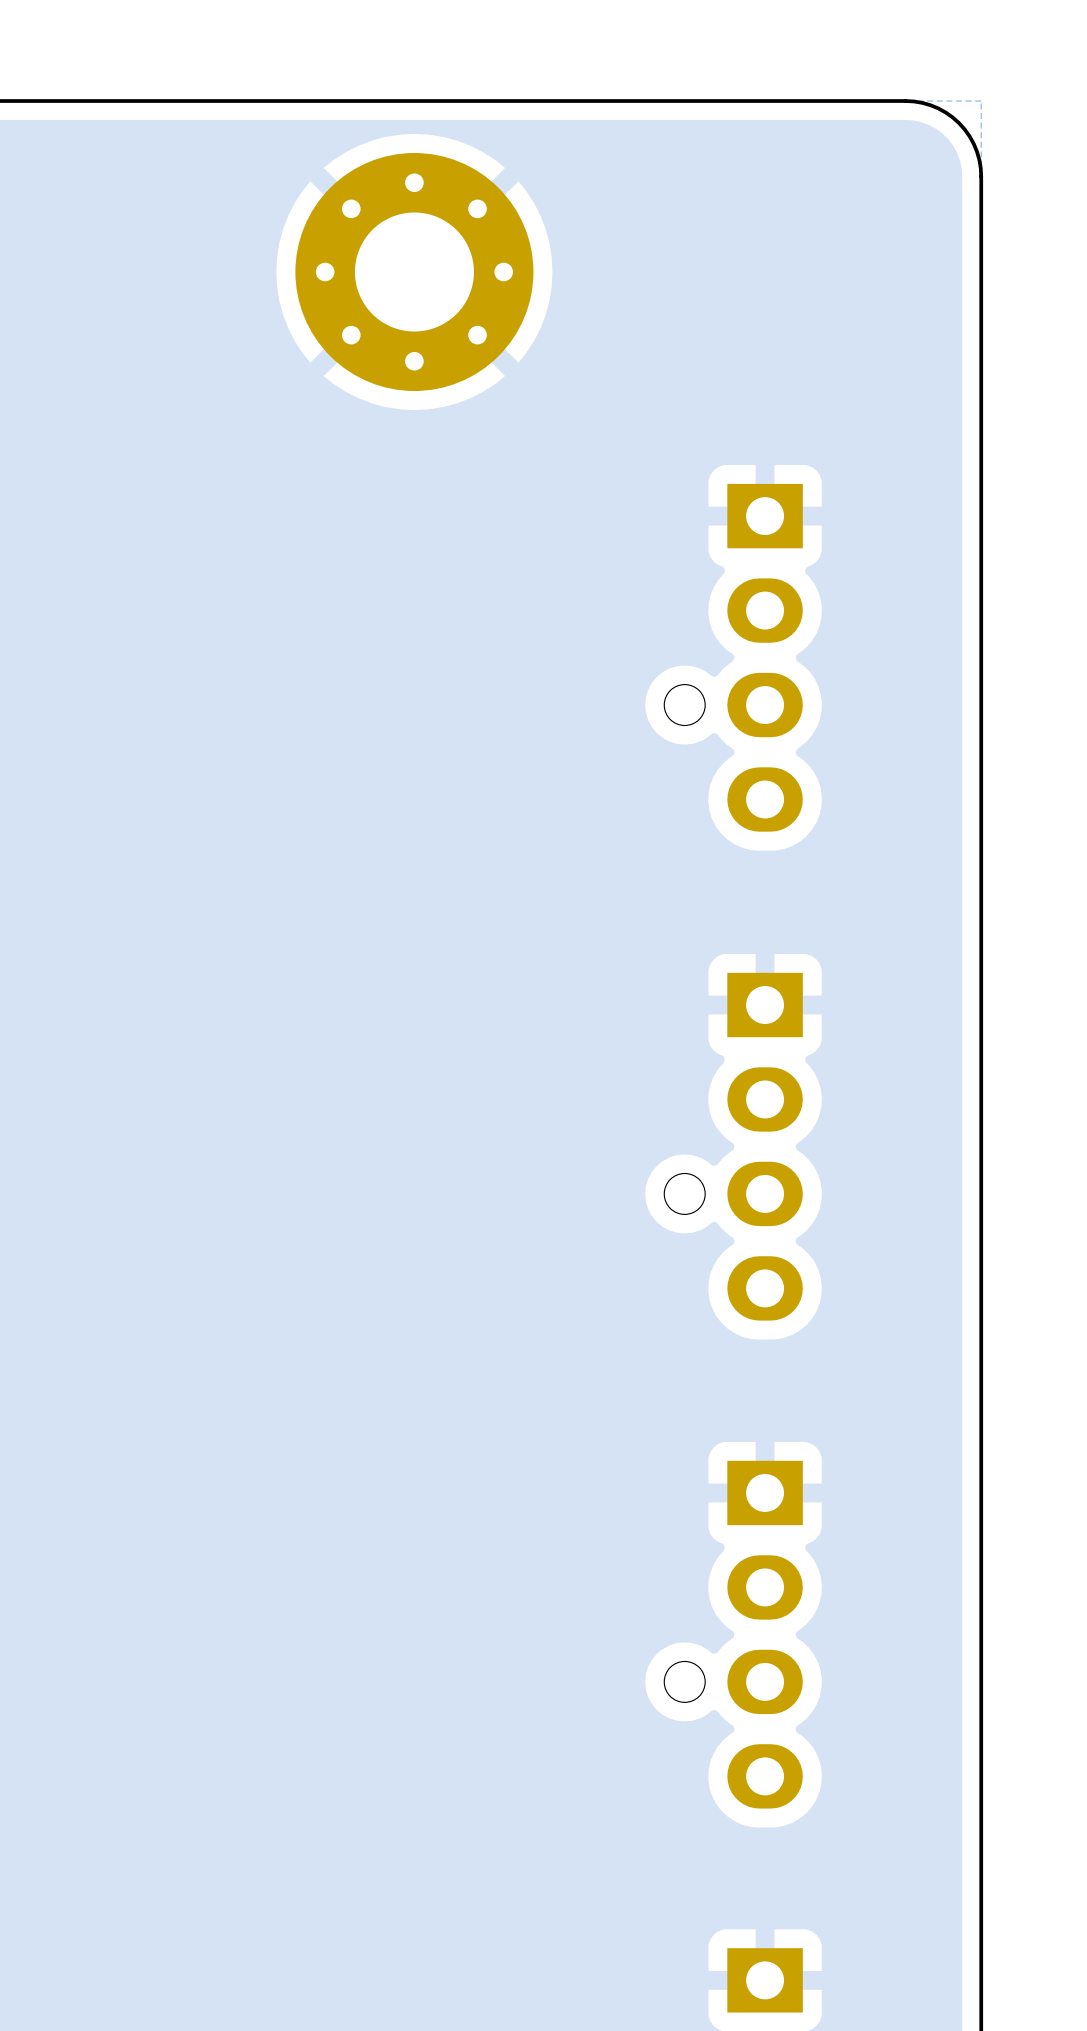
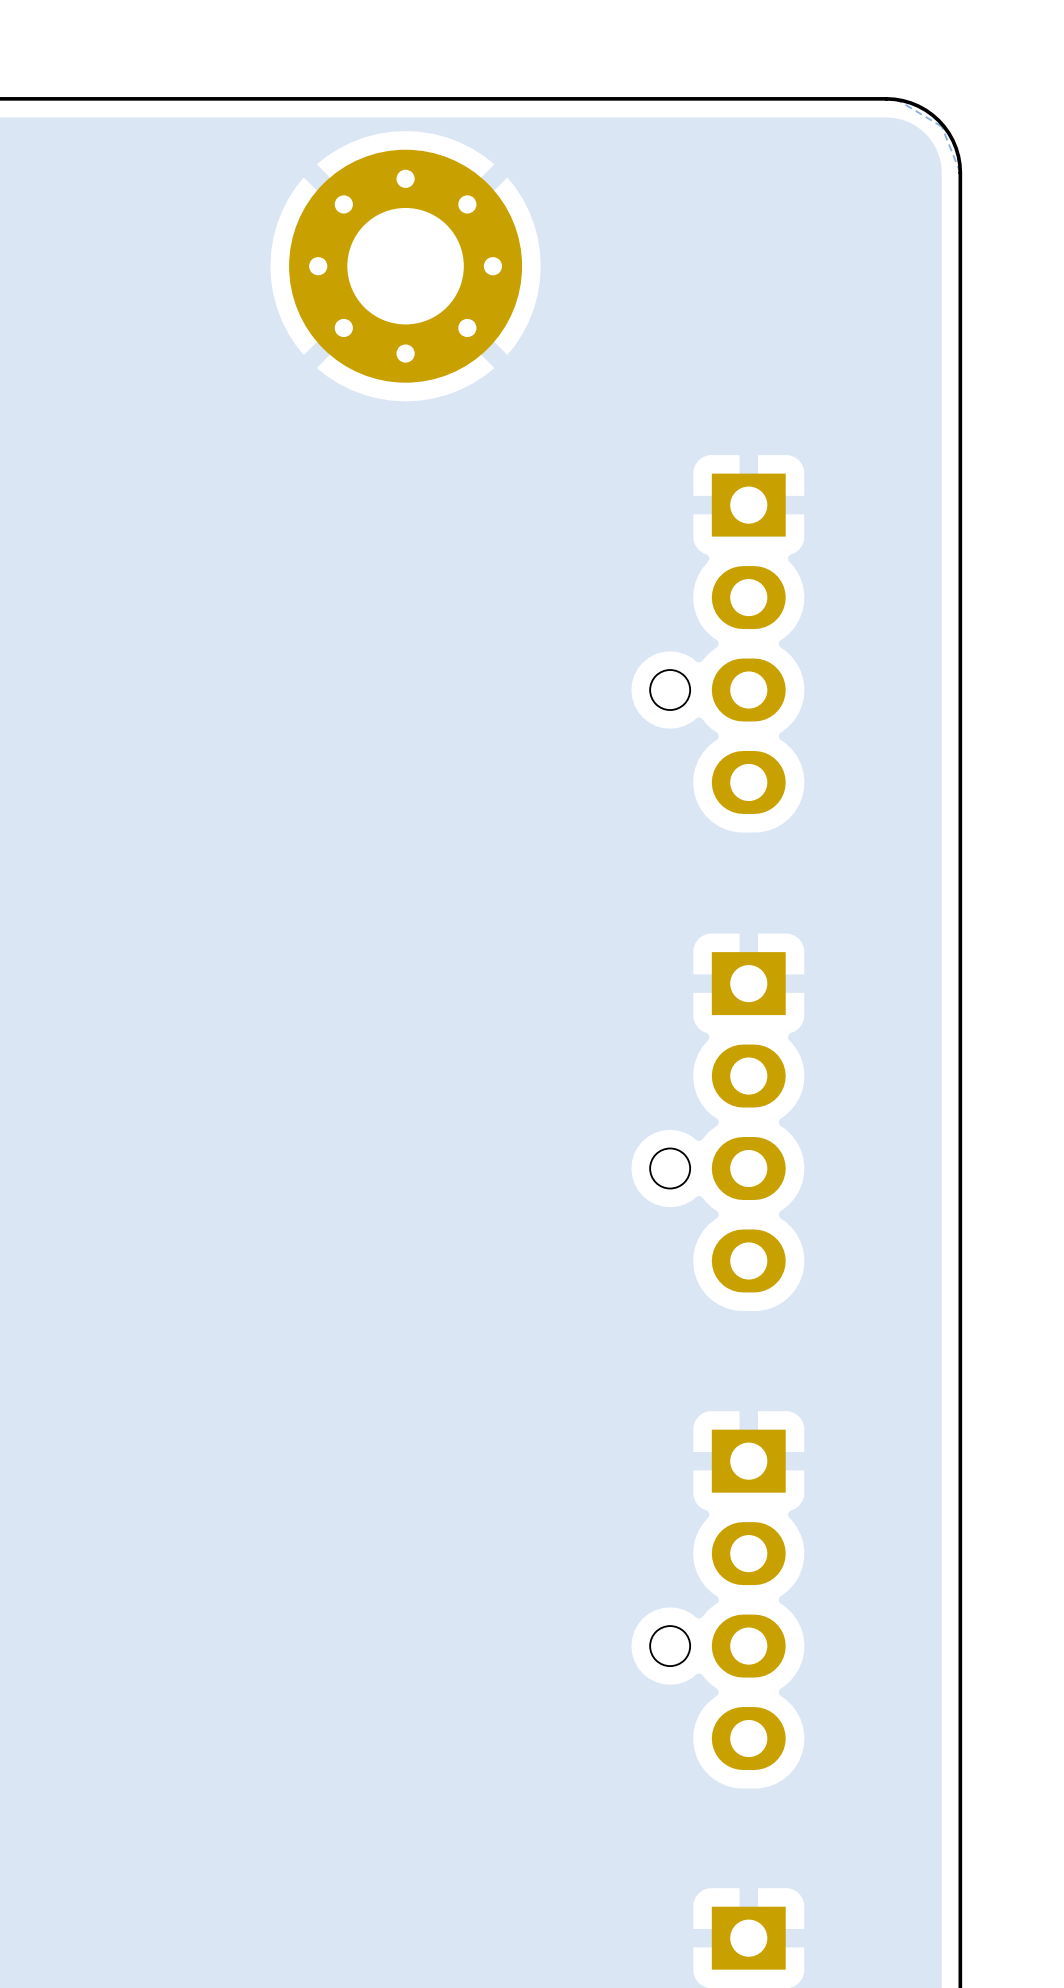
zone outline: (915, 101) (981, 101) (981, 176) -> (895, 98) (941, 126) (960, 172)

